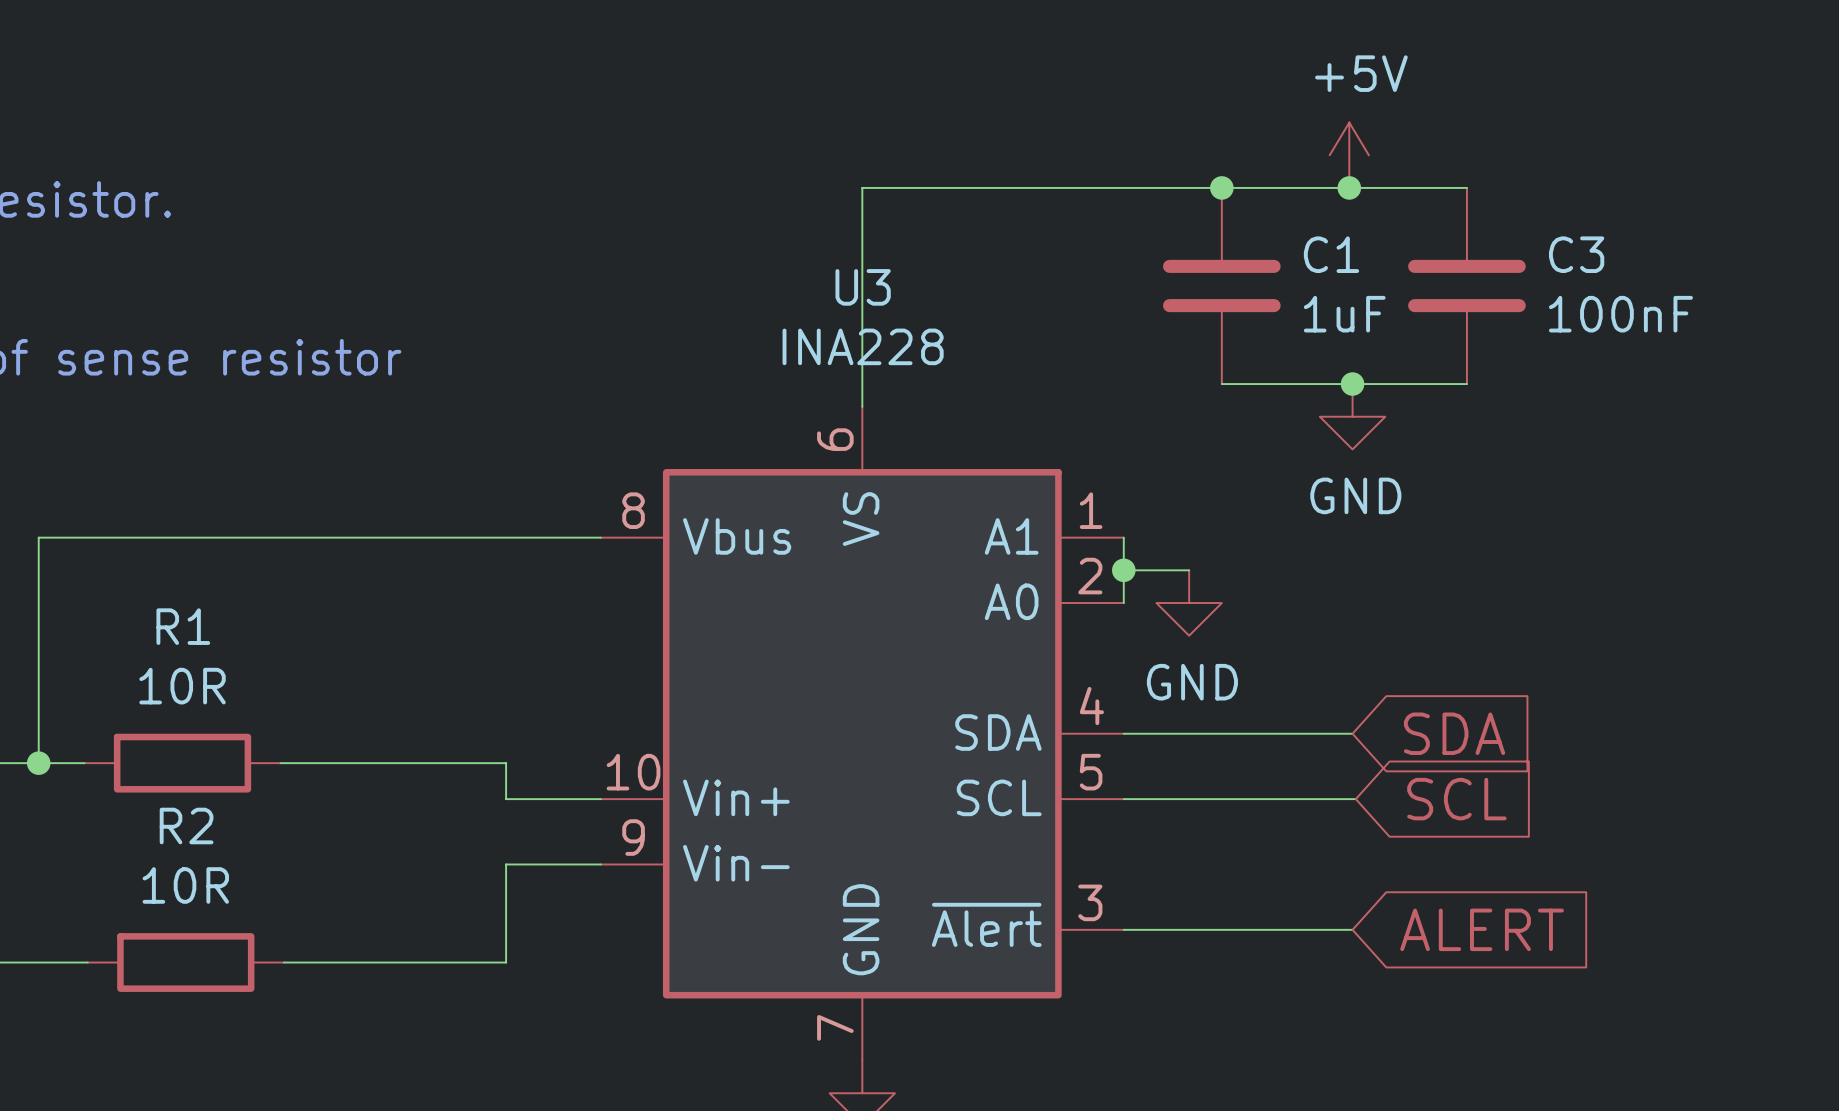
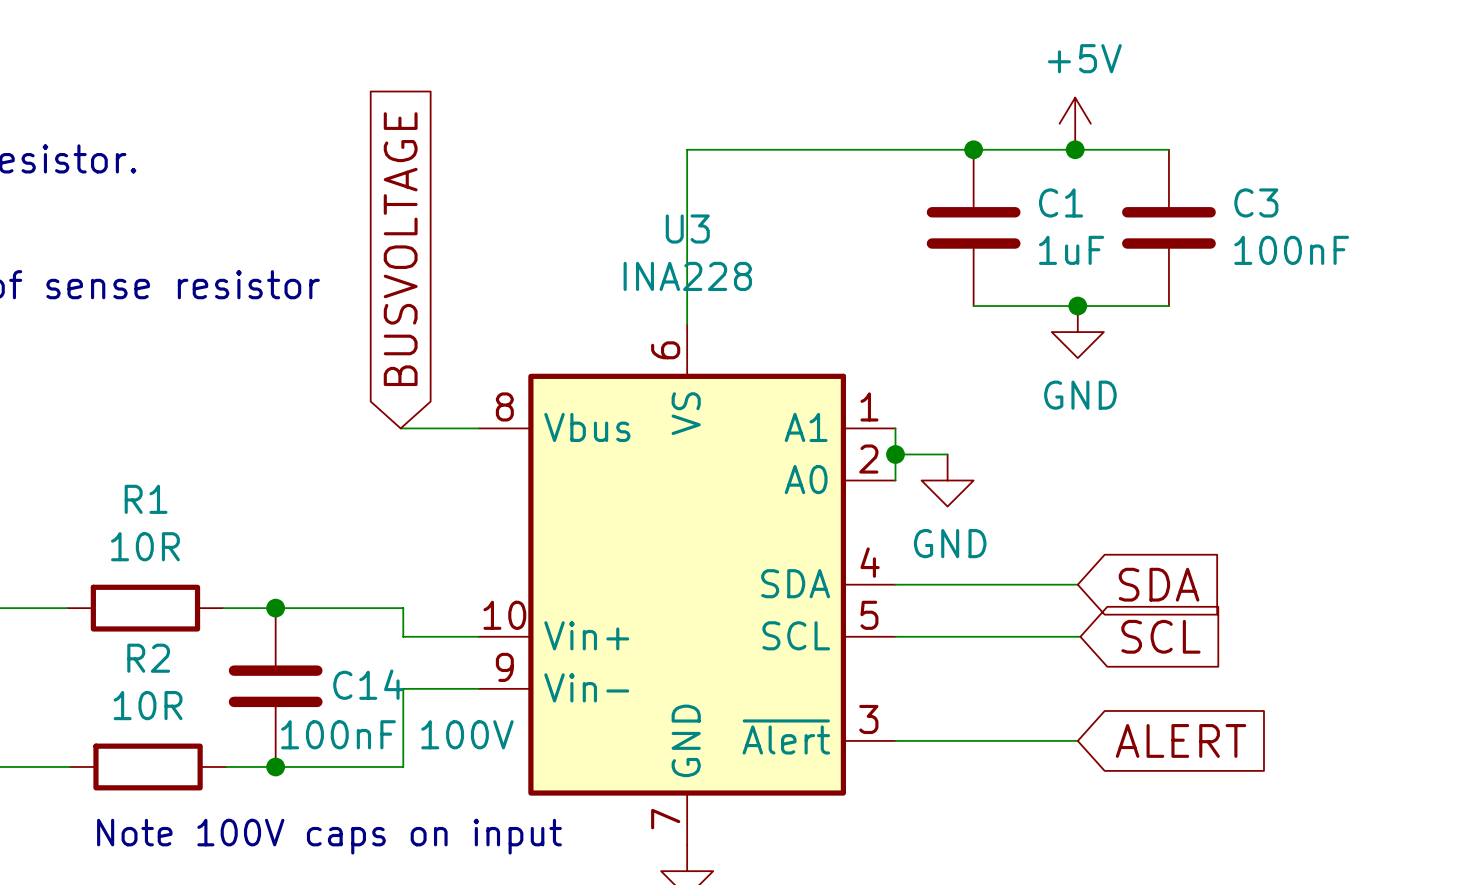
global label: none -> BUSVOLTAGE (400, 249)
wire: (502, 537) (38, 537) (38, 763) -> none
junction: (38, 763) -> none
junction: none -> (275, 608)
C14: none -> 100nF 100V (275, 686)
junction: none -> (275, 766)
text: none -> Note 100V caps on input (329, 836)

